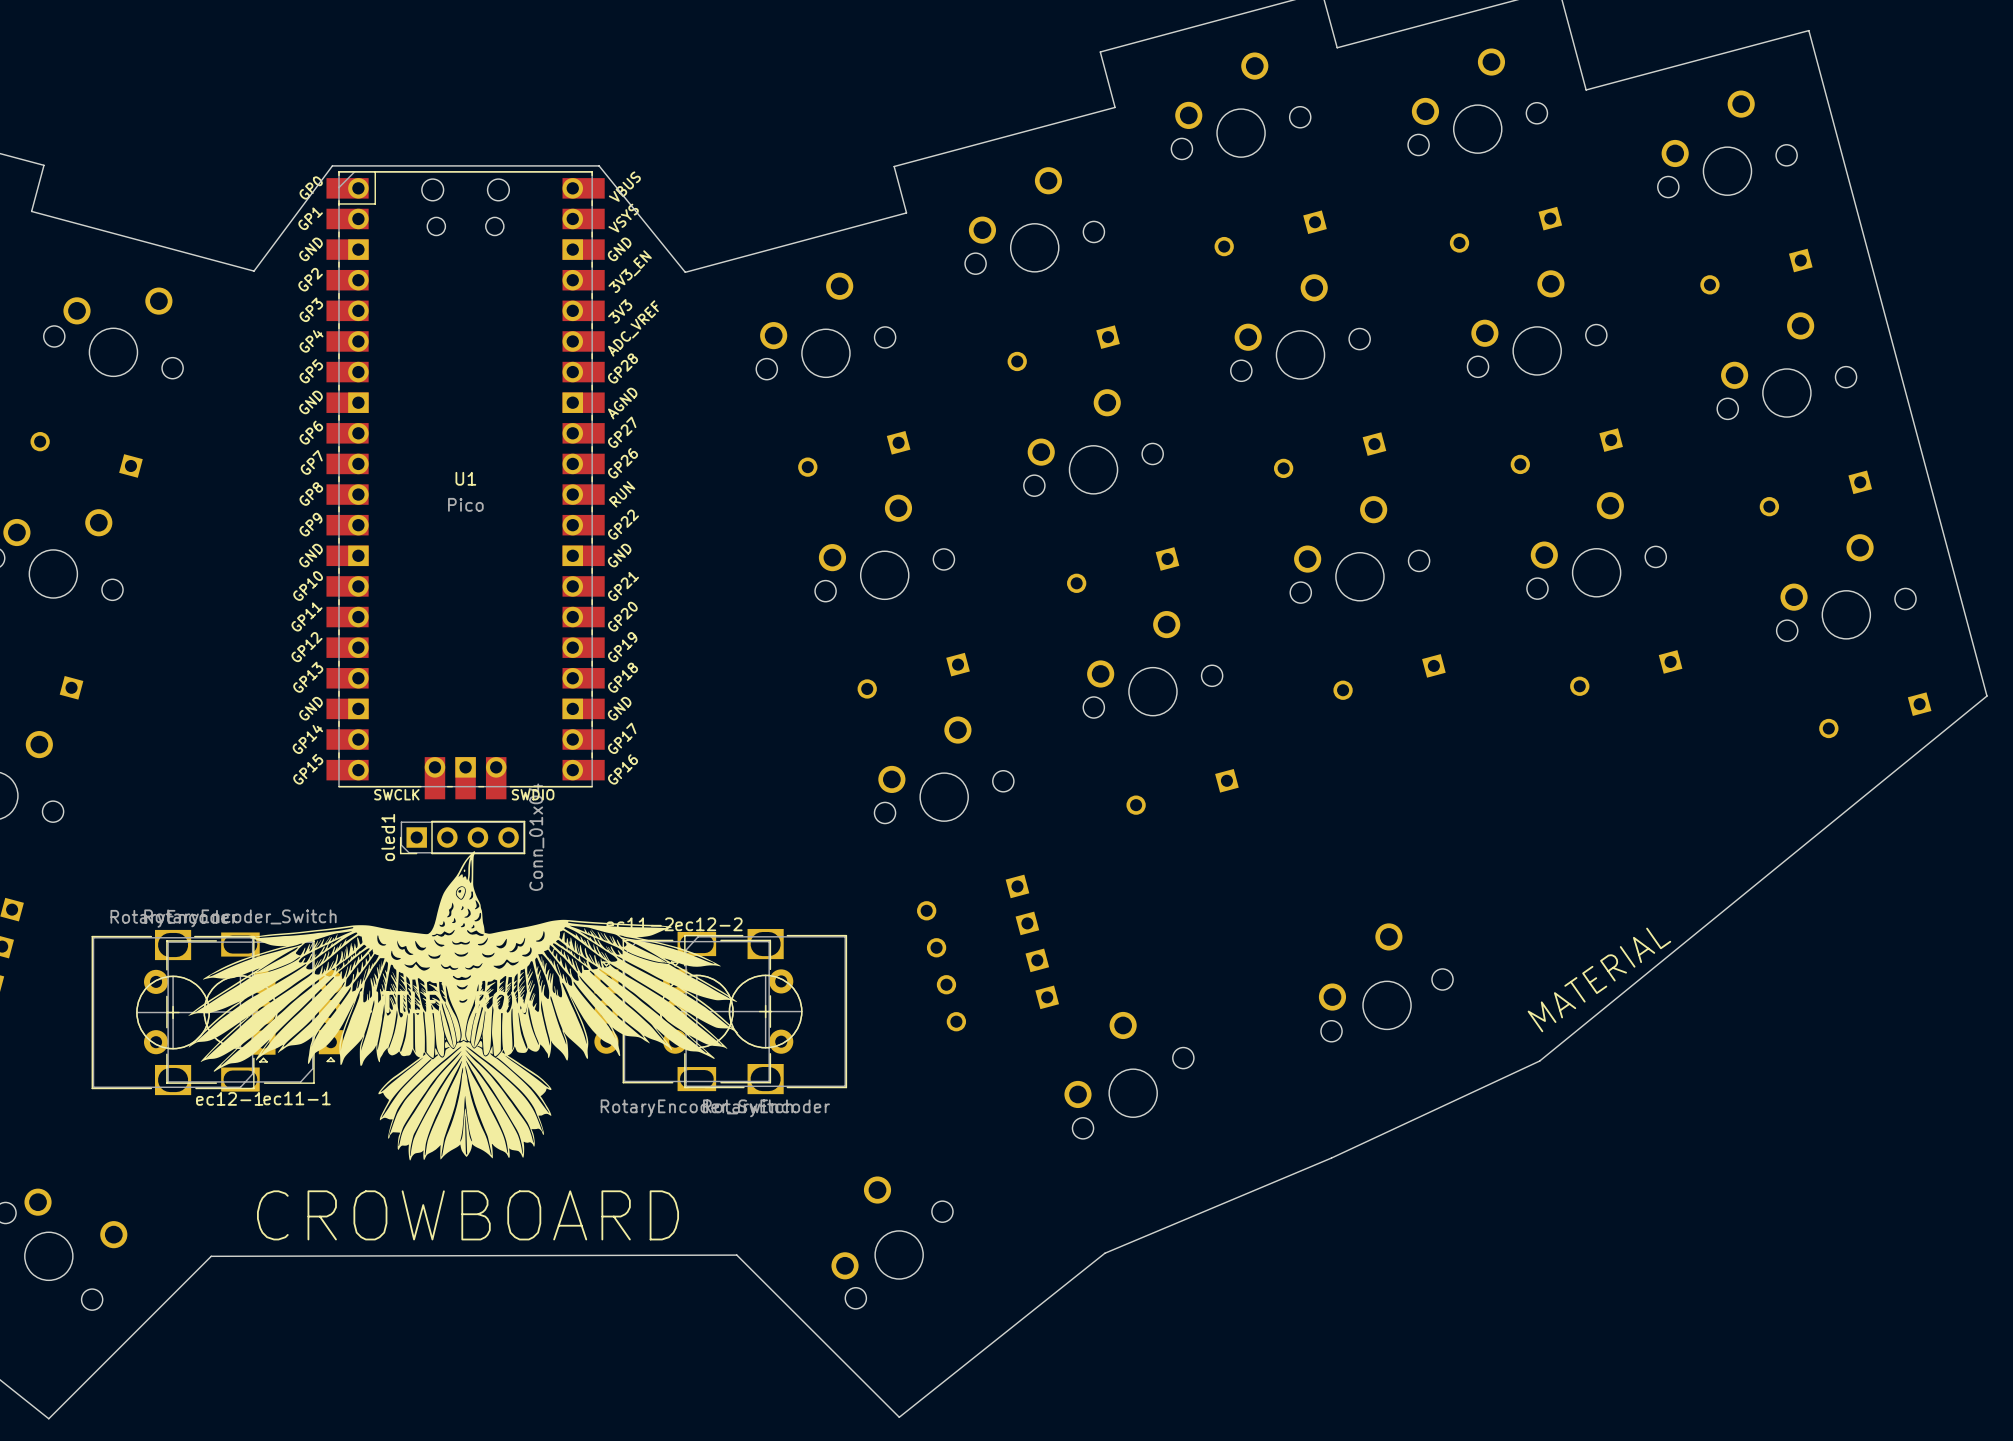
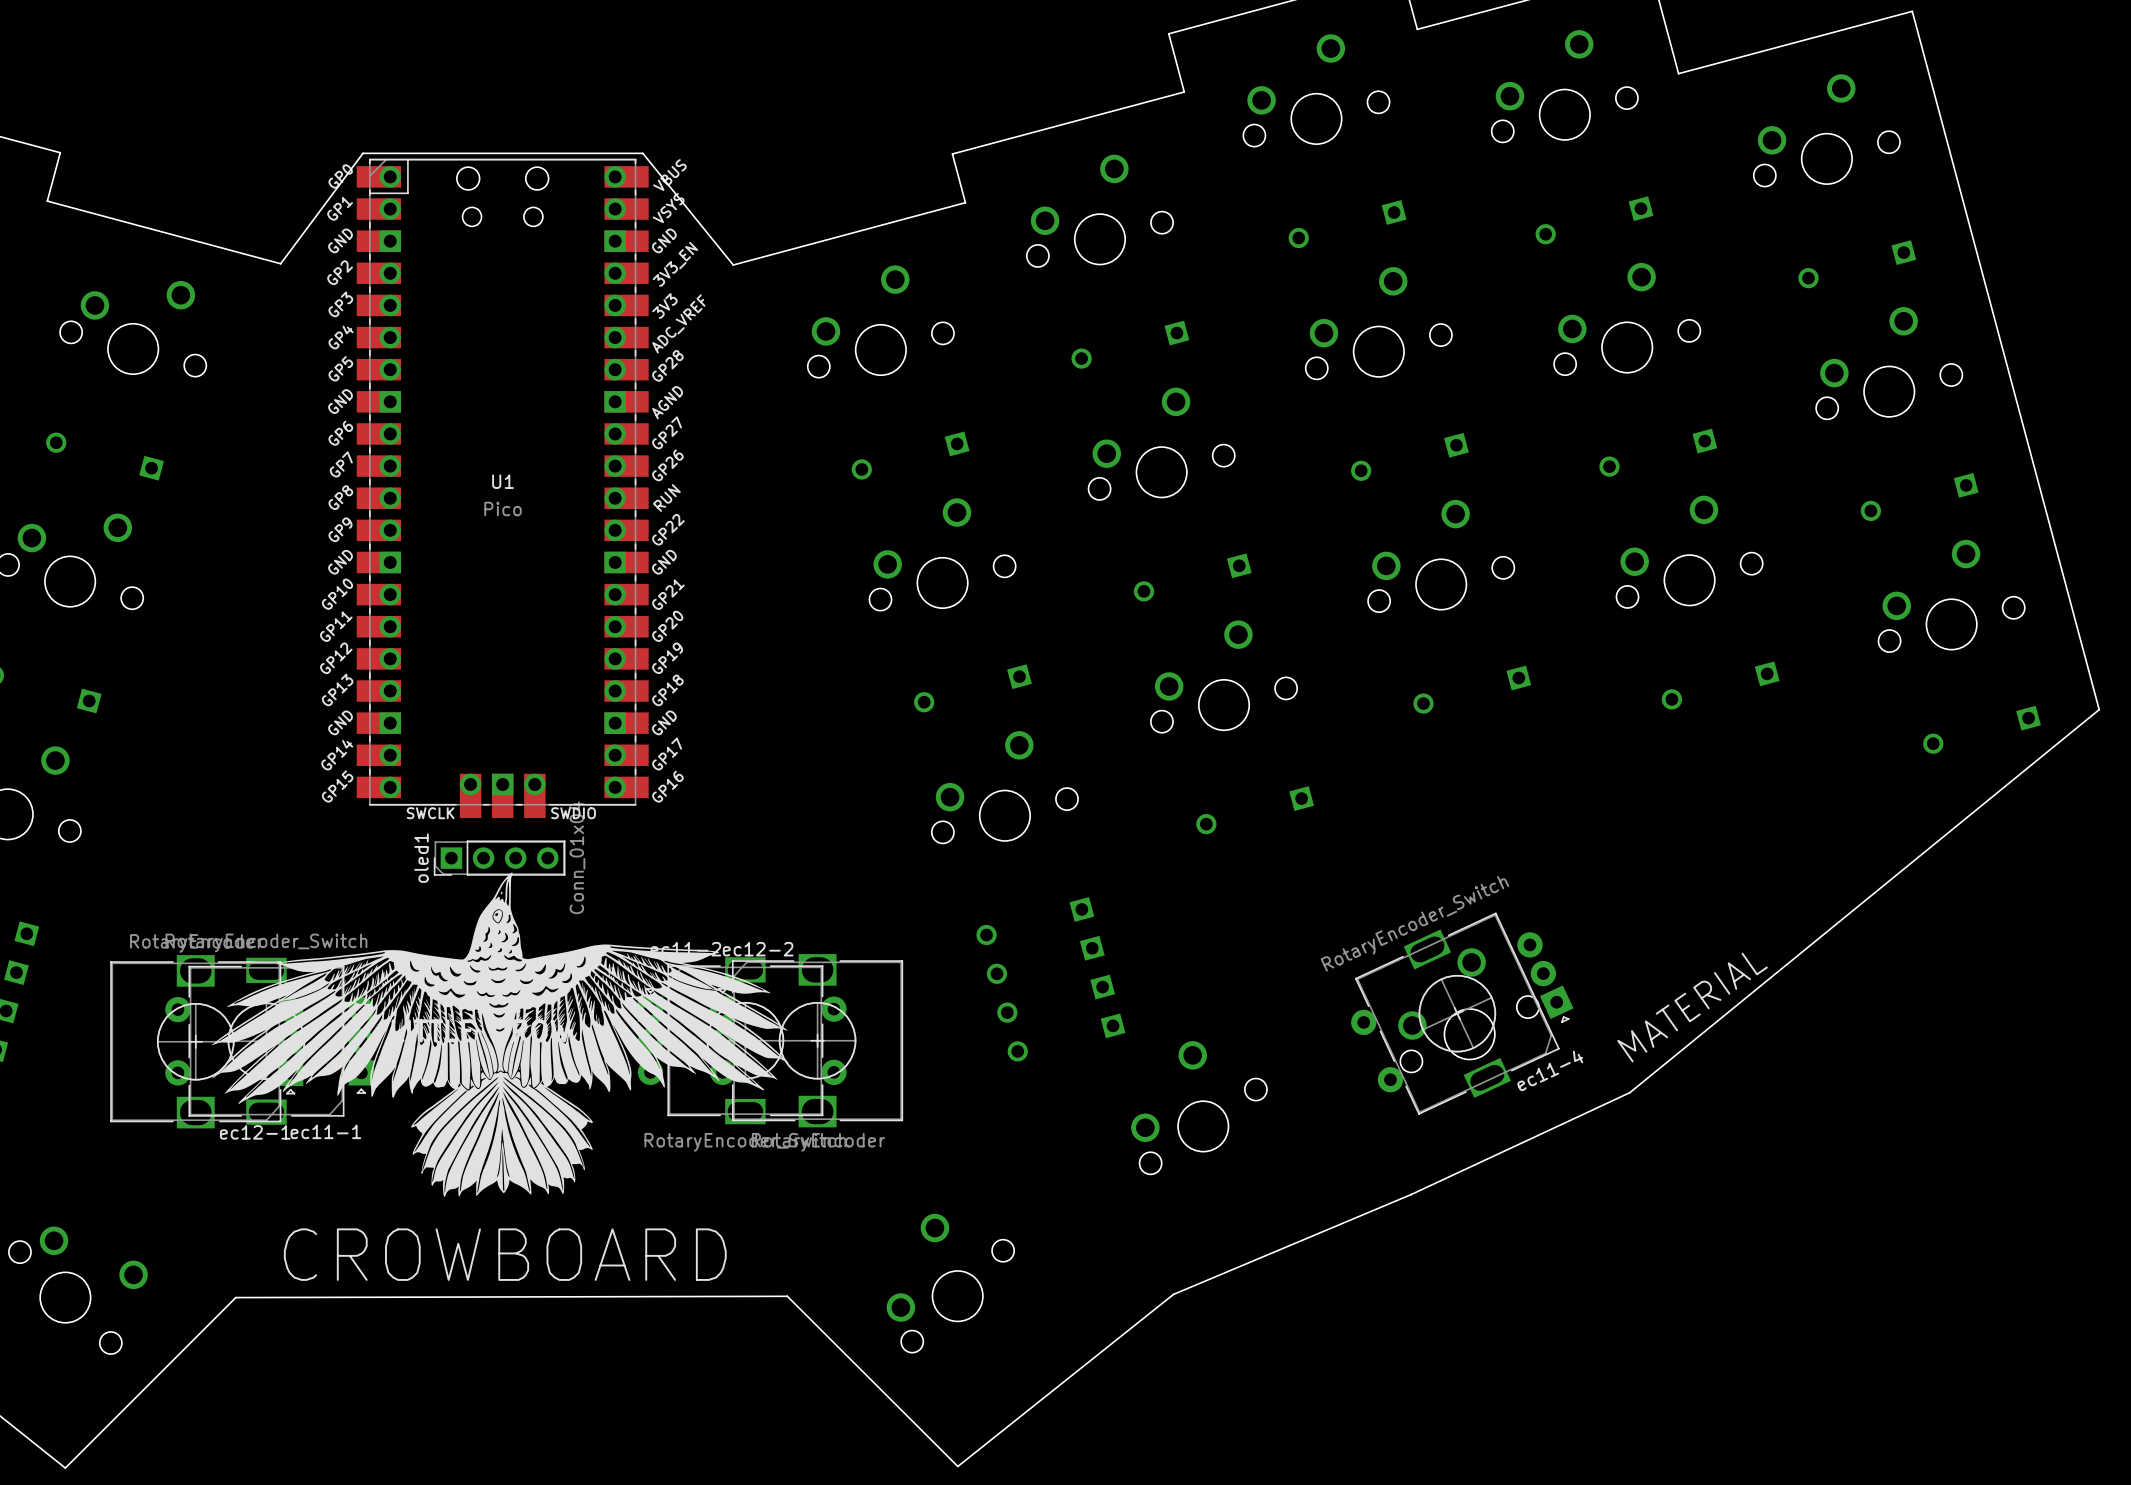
ec11-4: none -> RotaryEncoder_Switch (1462, 1013)

